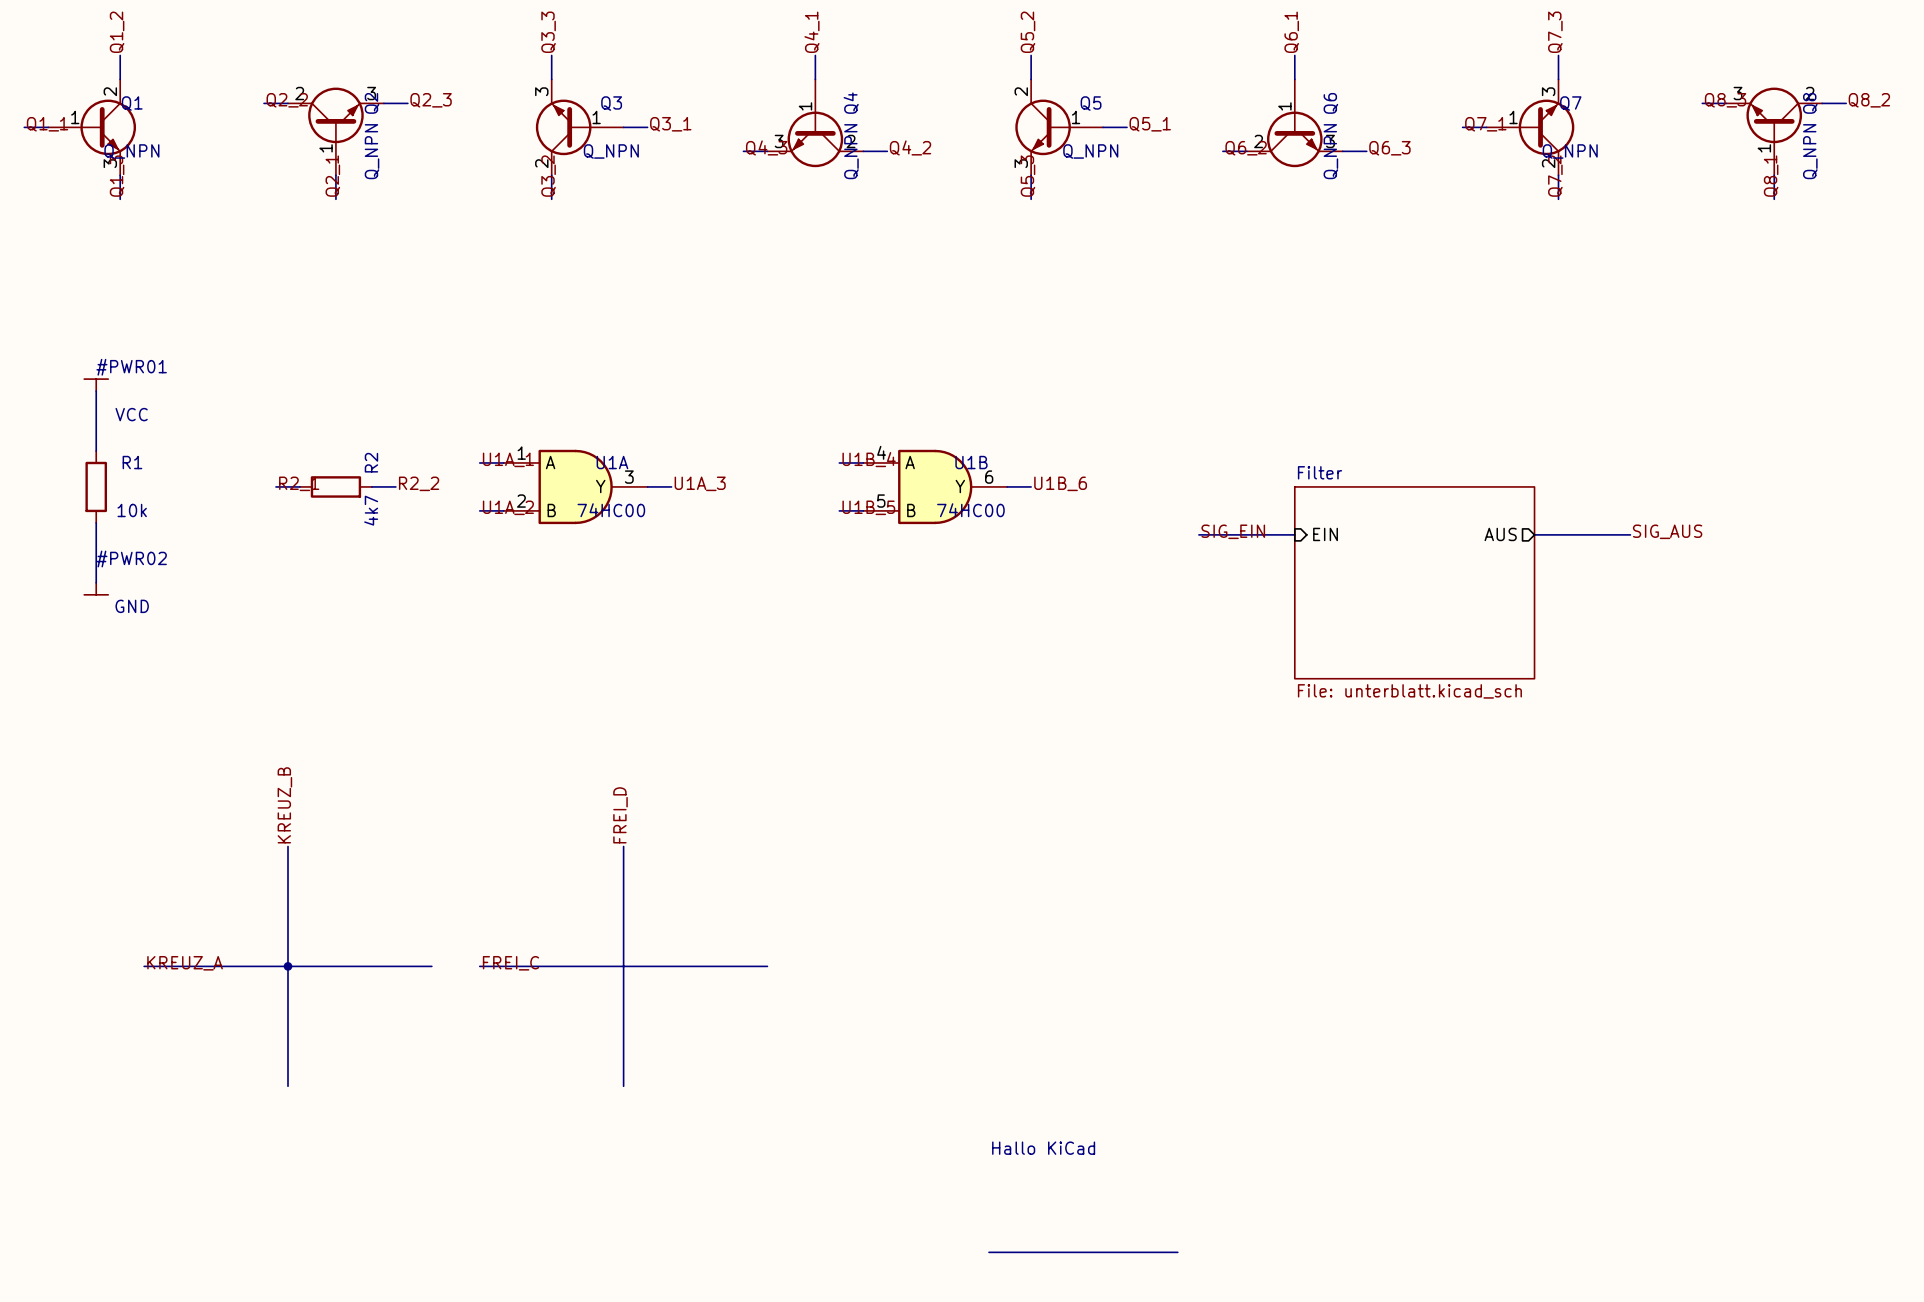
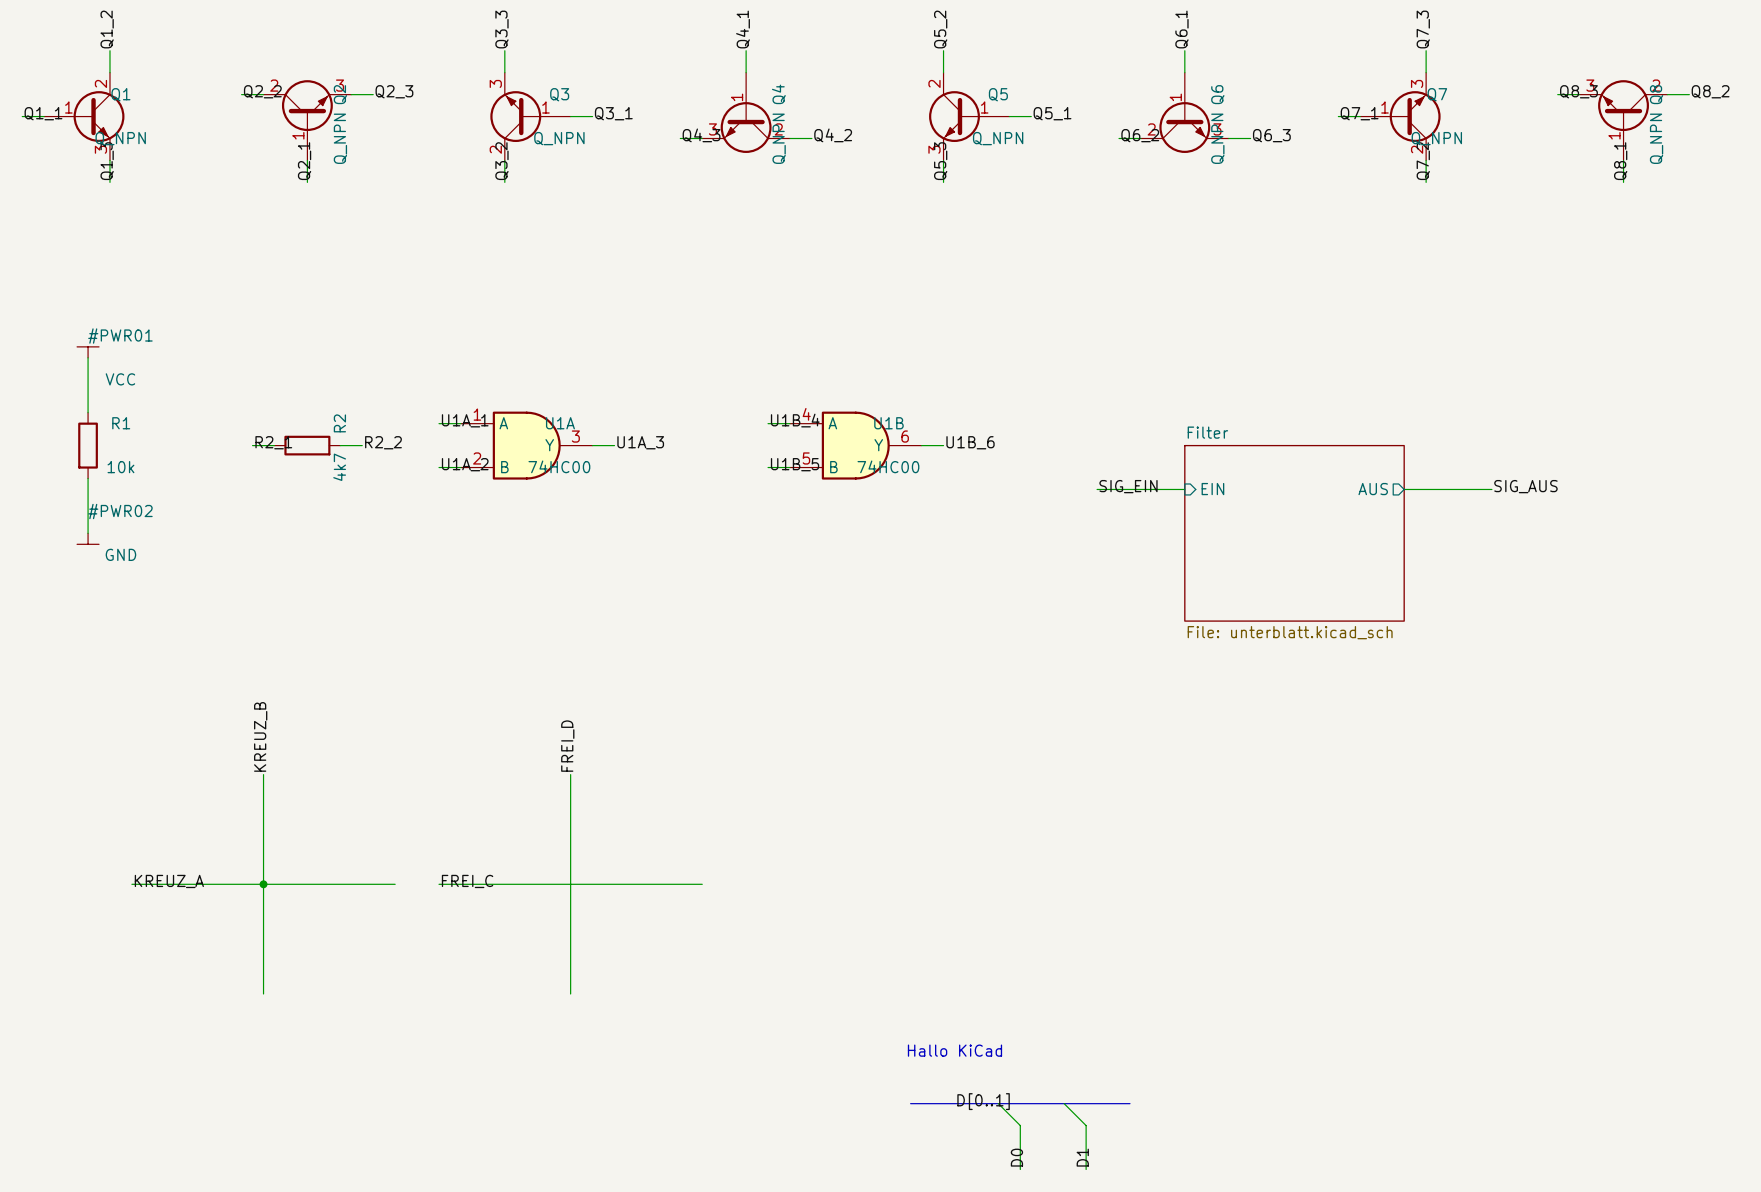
label: none -> D[0..1] (983, 1101)
bus: none -> (910, 1103) (1129, 1103)
wire: none -> (998, 1103) (1020, 1125) (1020, 1169)
wire: none -> (1064, 1103) (1086, 1125) (1086, 1169)
bus: (989, 1252) (1177, 1252) -> none
label: none -> D0 (1016, 1157)
label: none -> D1 (1082, 1157)

